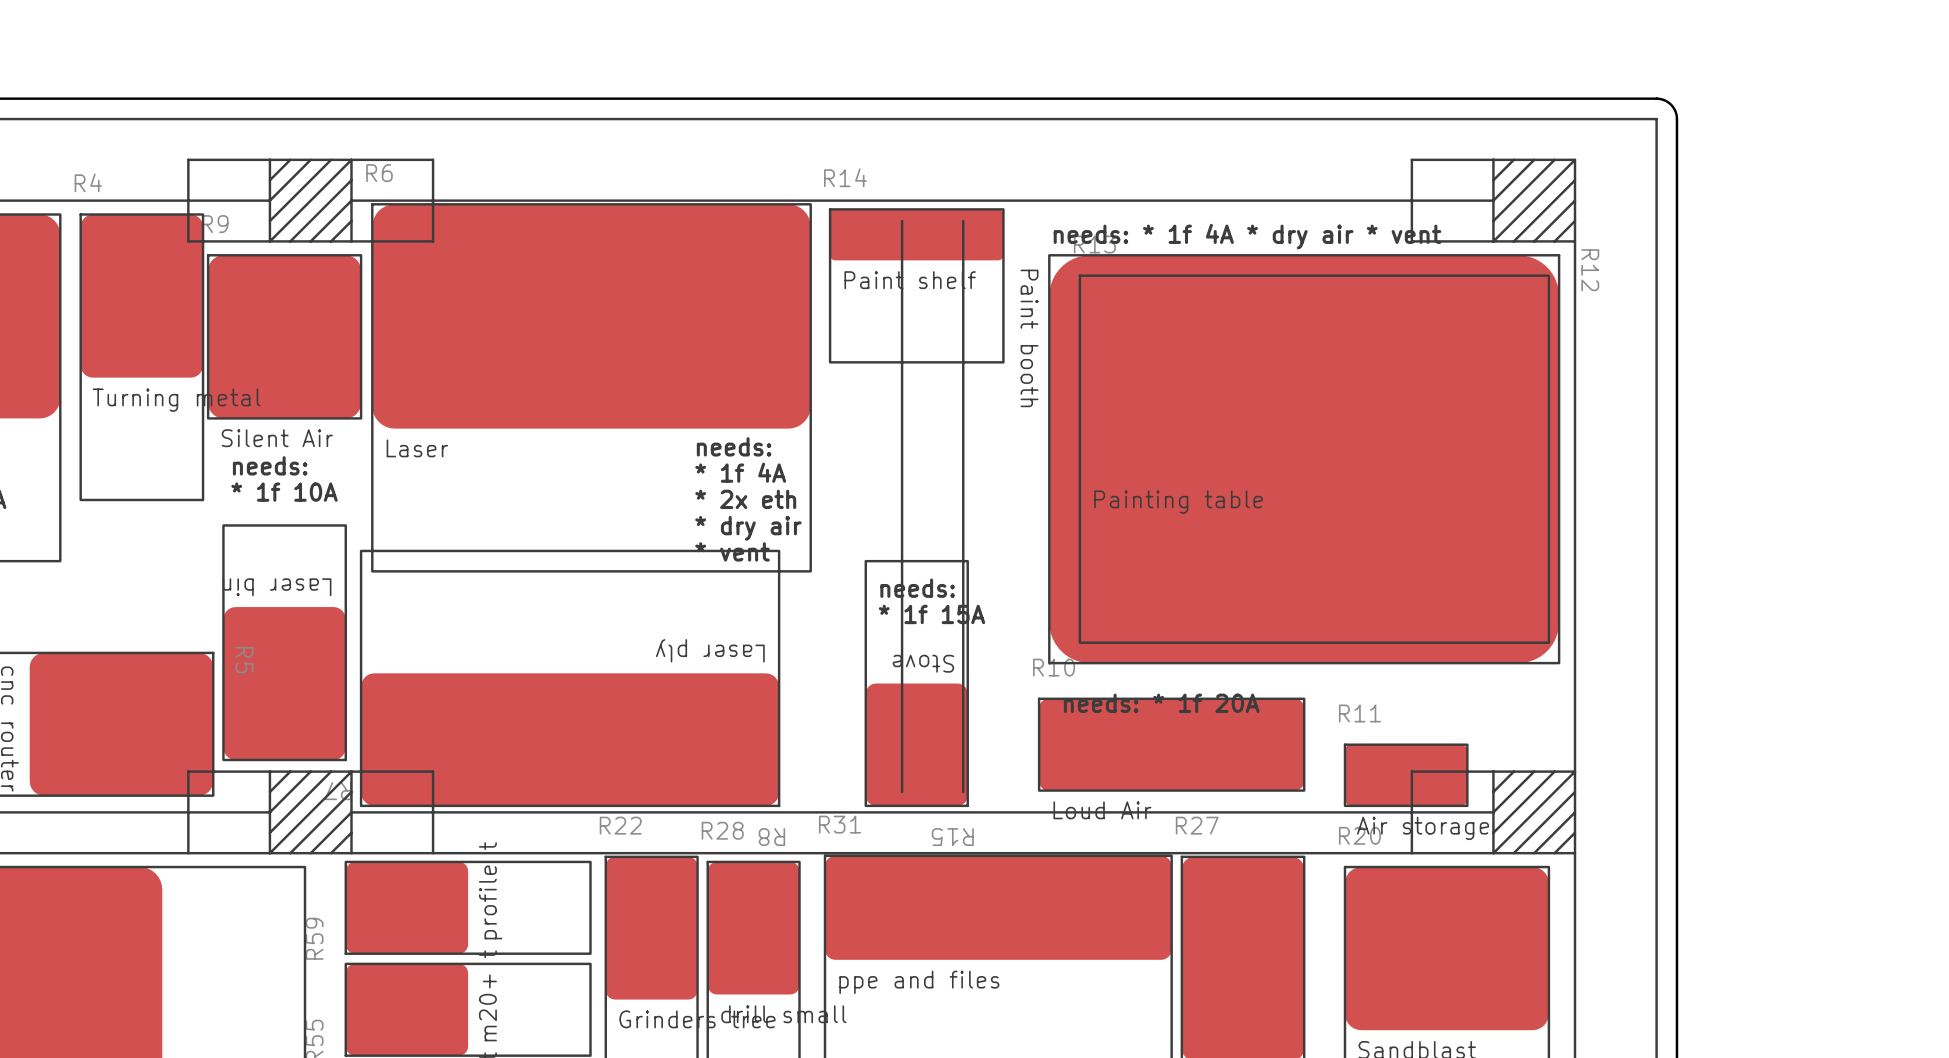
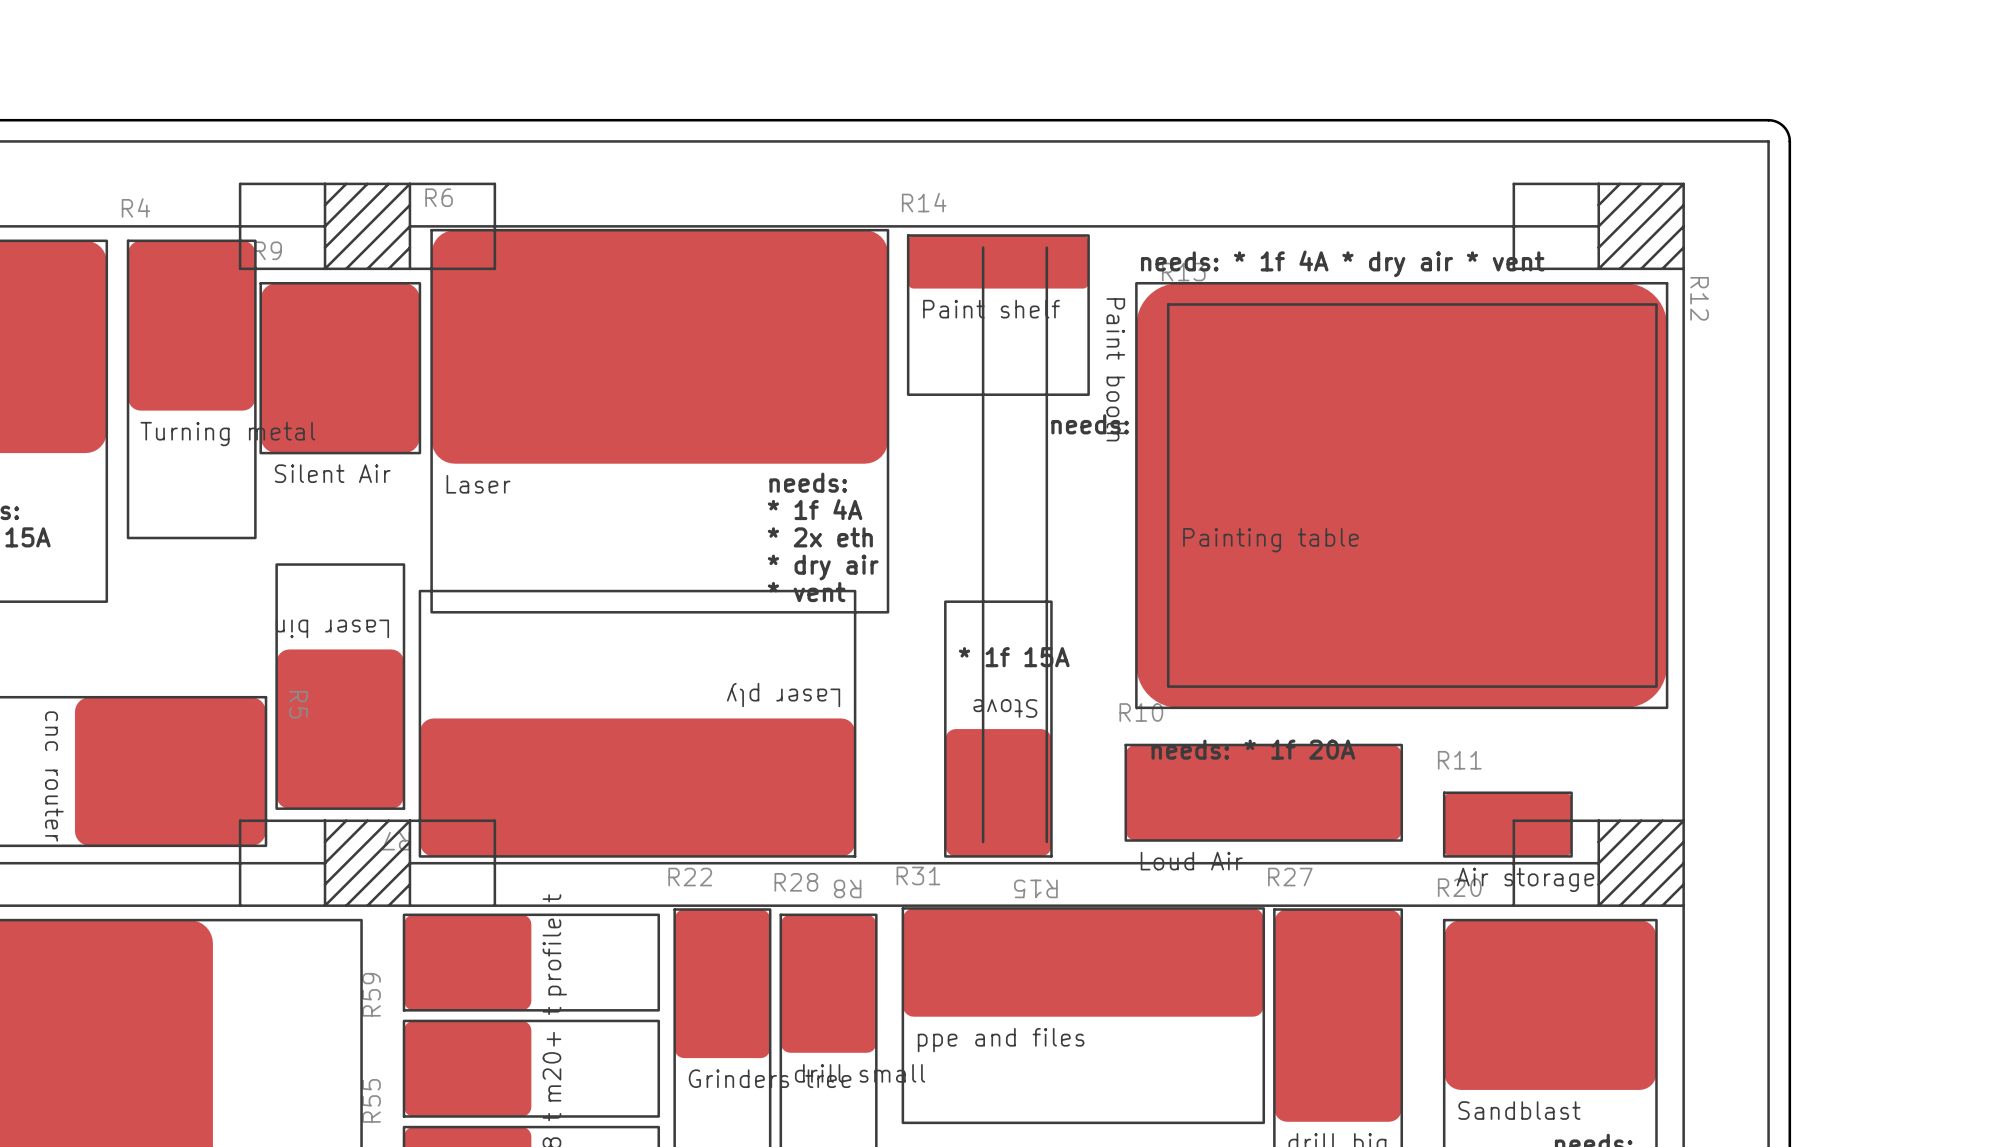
text: needs: (270, 465) -> none
text: * 1f 10A (284, 492) -> none
text position: needs: (917, 588) -> needs: (1090, 424)

